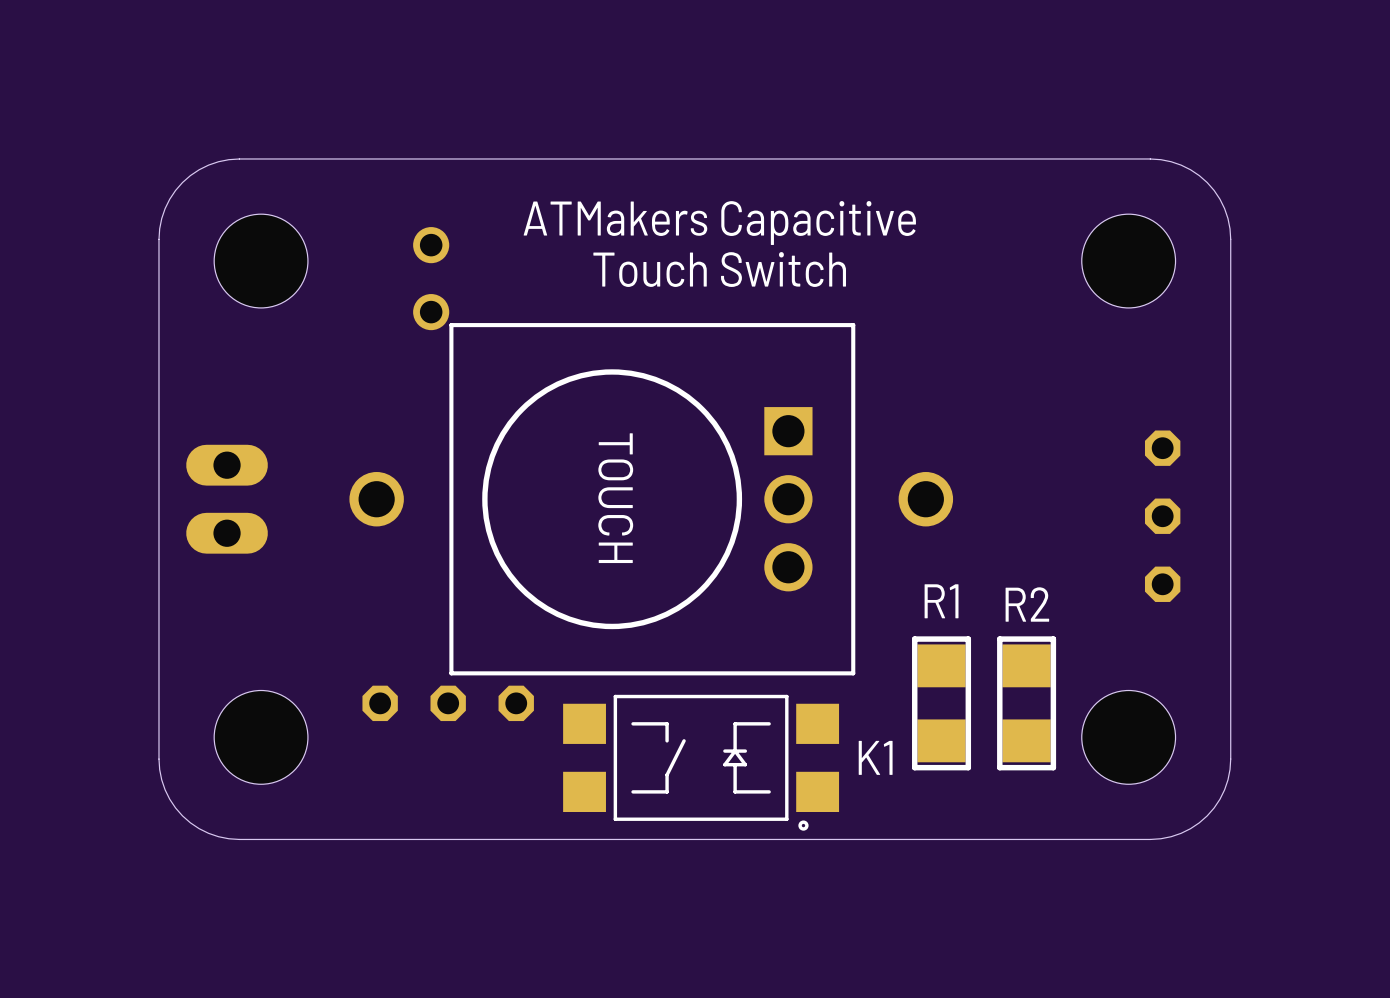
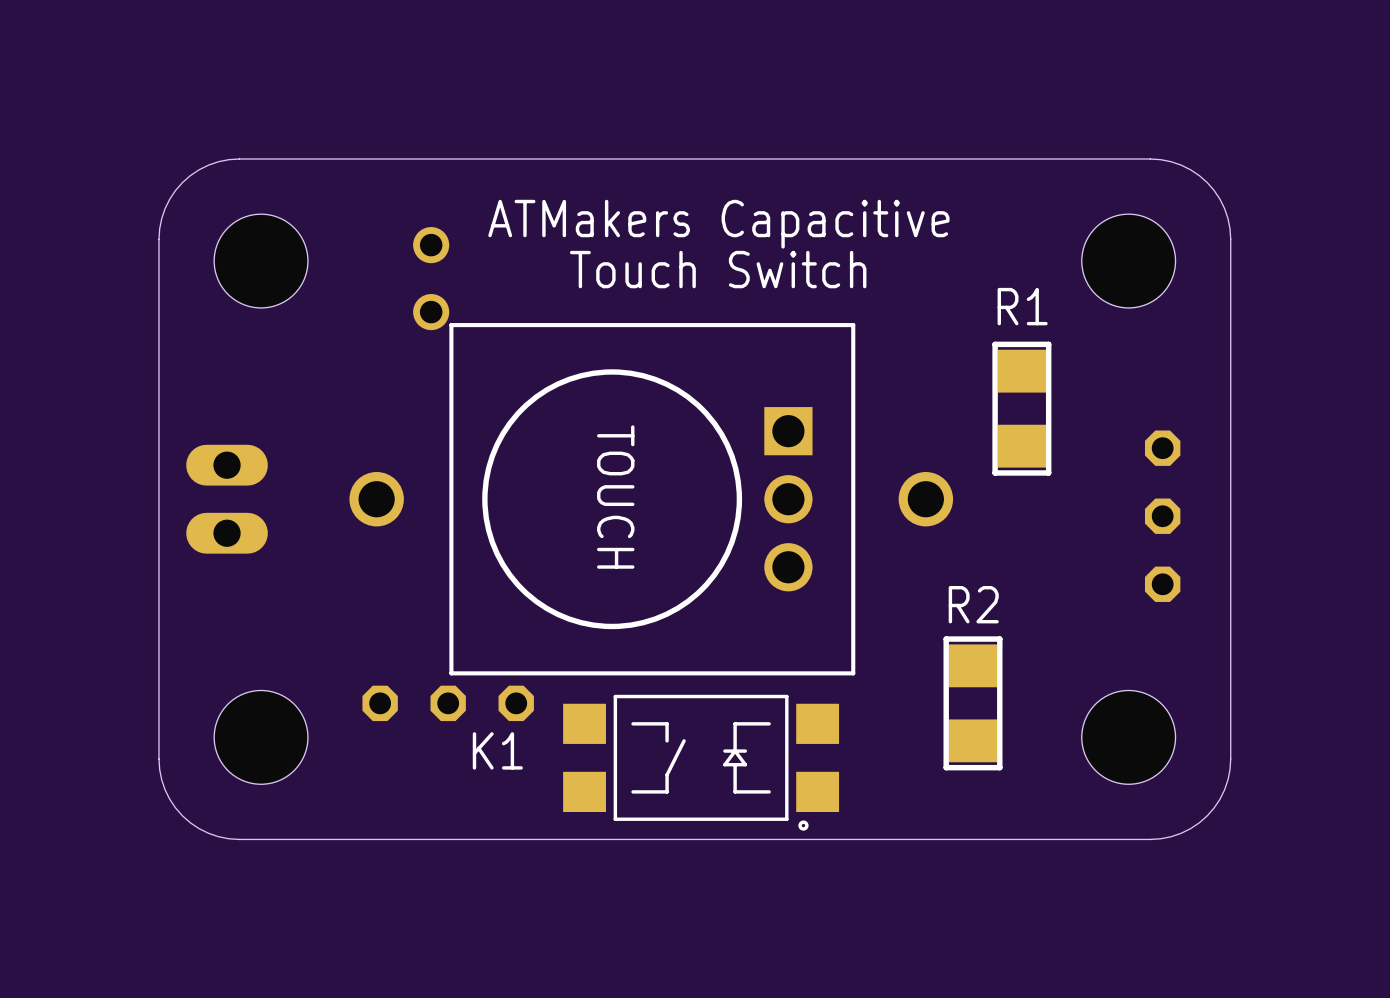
R1 position: (941, 703) -> (1021, 408)
R2 position: (1026, 703) -> (973, 703)
K1 name position: K1 (875, 757) -> K1 (497, 750)

